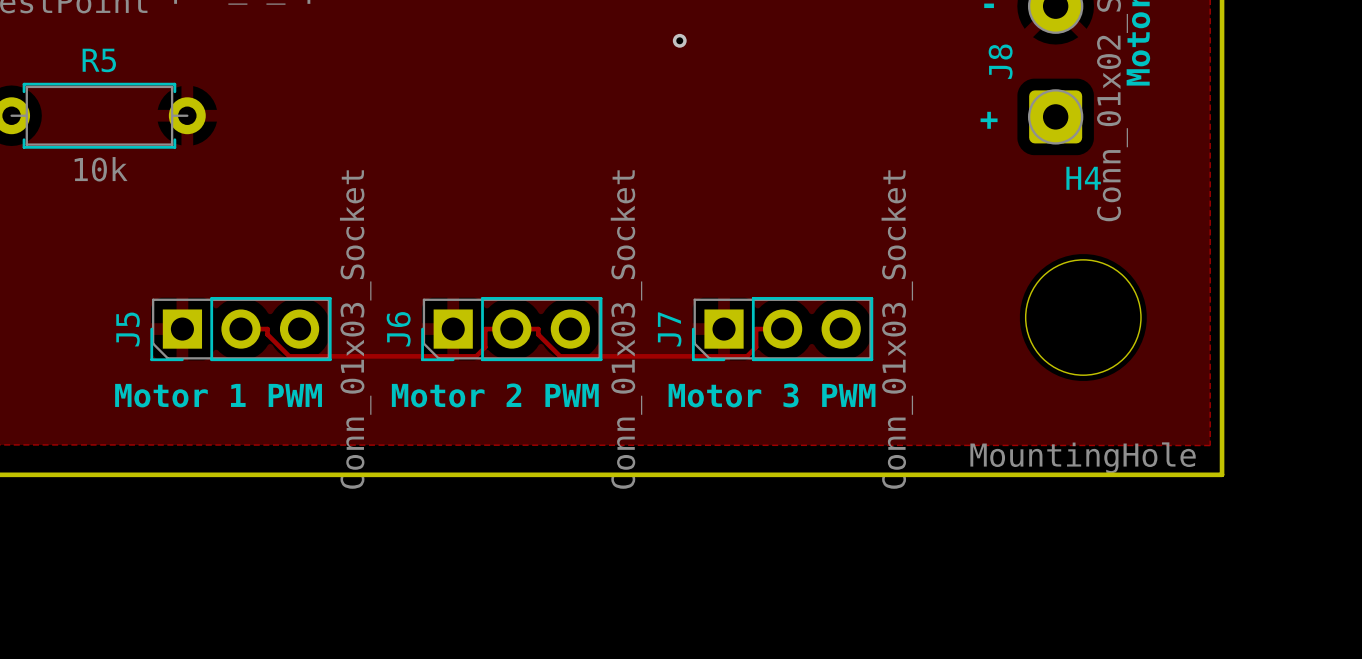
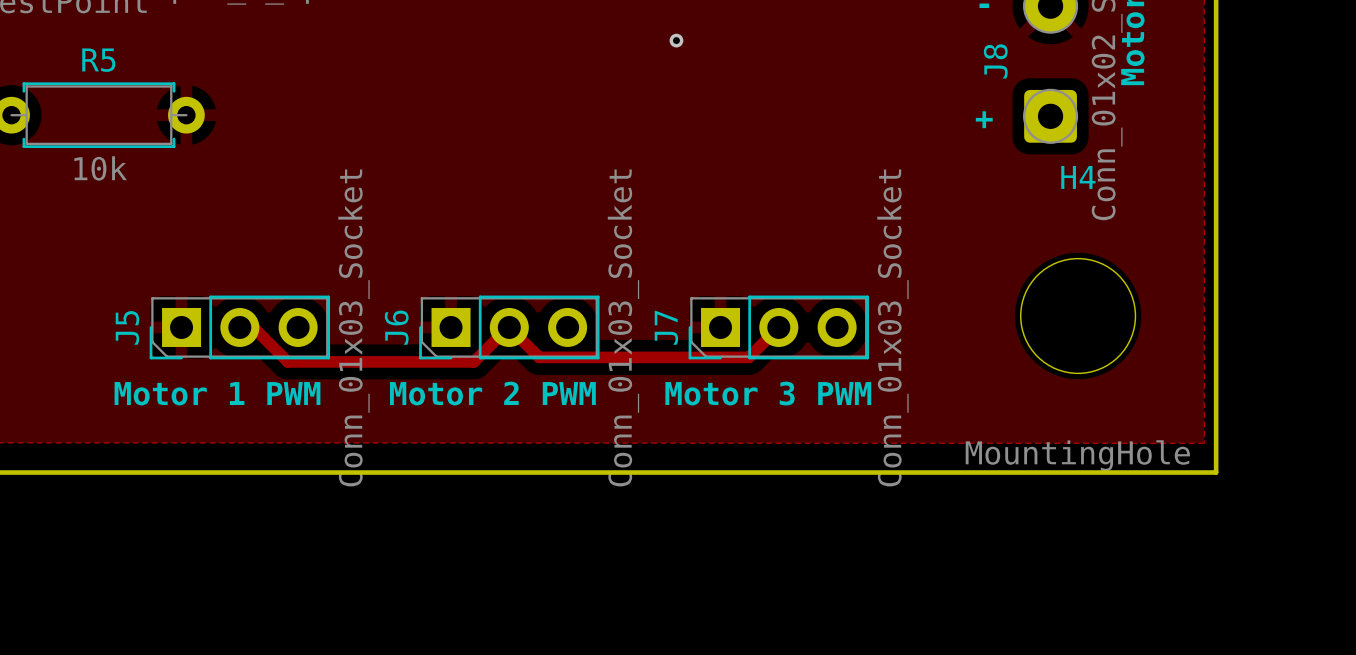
track: (254, 329) (267, 329) (267, 334) (289, 356) (476, 356) (485, 347) (485, 329) (510, 329) -> none
track: (511, 329) (538, 329) (538, 334) (560, 356) (747, 356) (756, 347) (756, 329) (782, 329) -> (253, 327) (287, 361) (473, 361) (508, 327) (539, 357) (748, 357) (778, 327)

